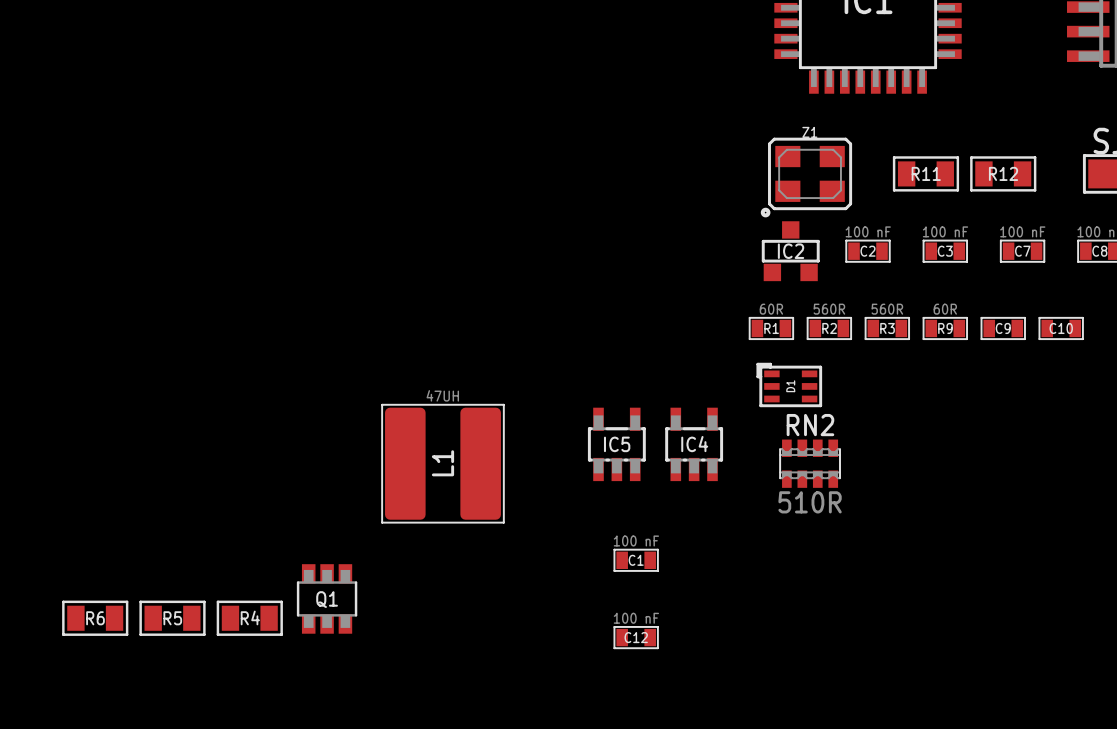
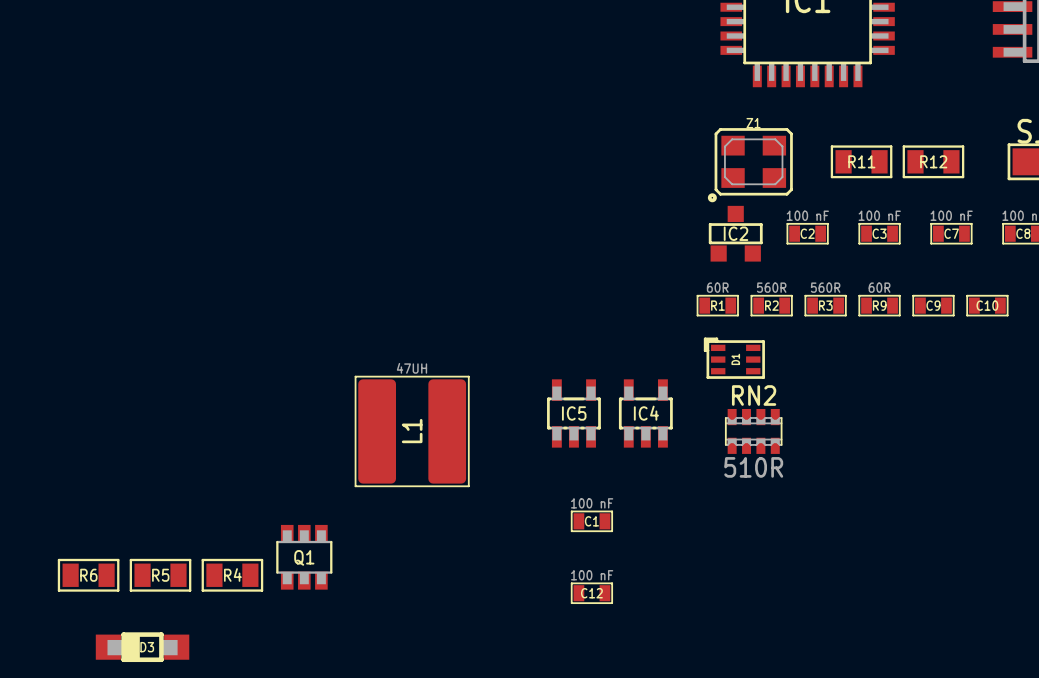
D3: none -> (142, 647)

